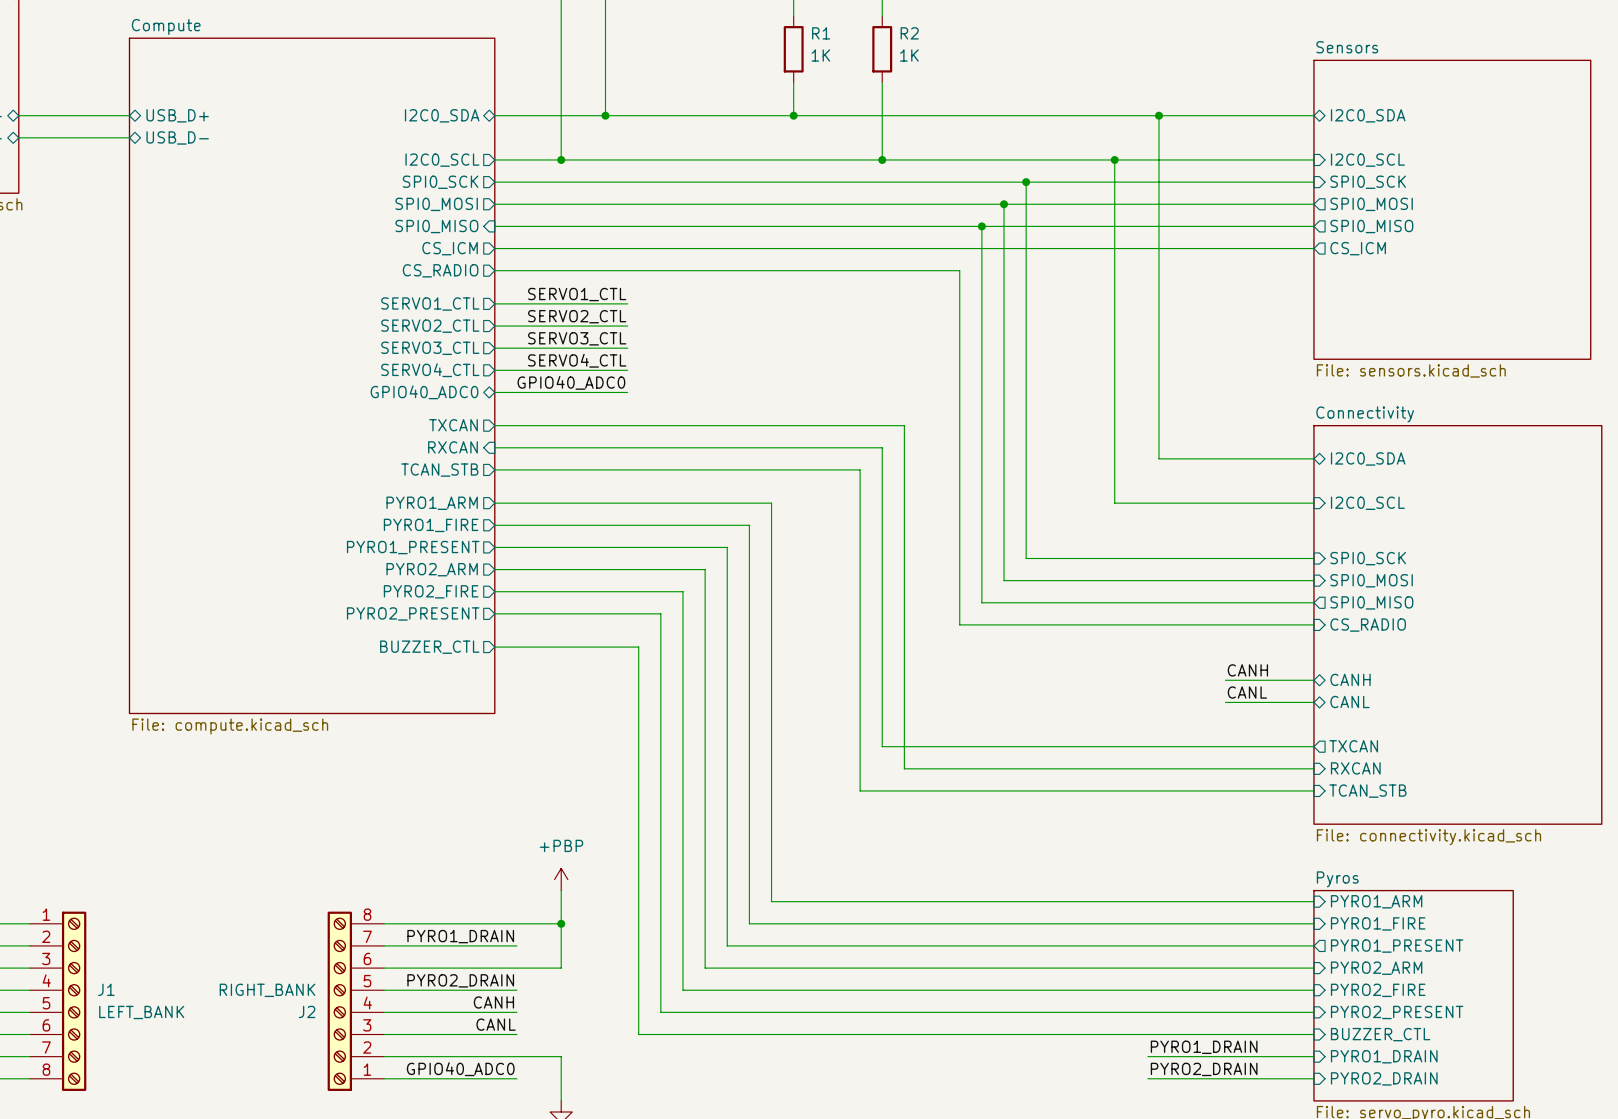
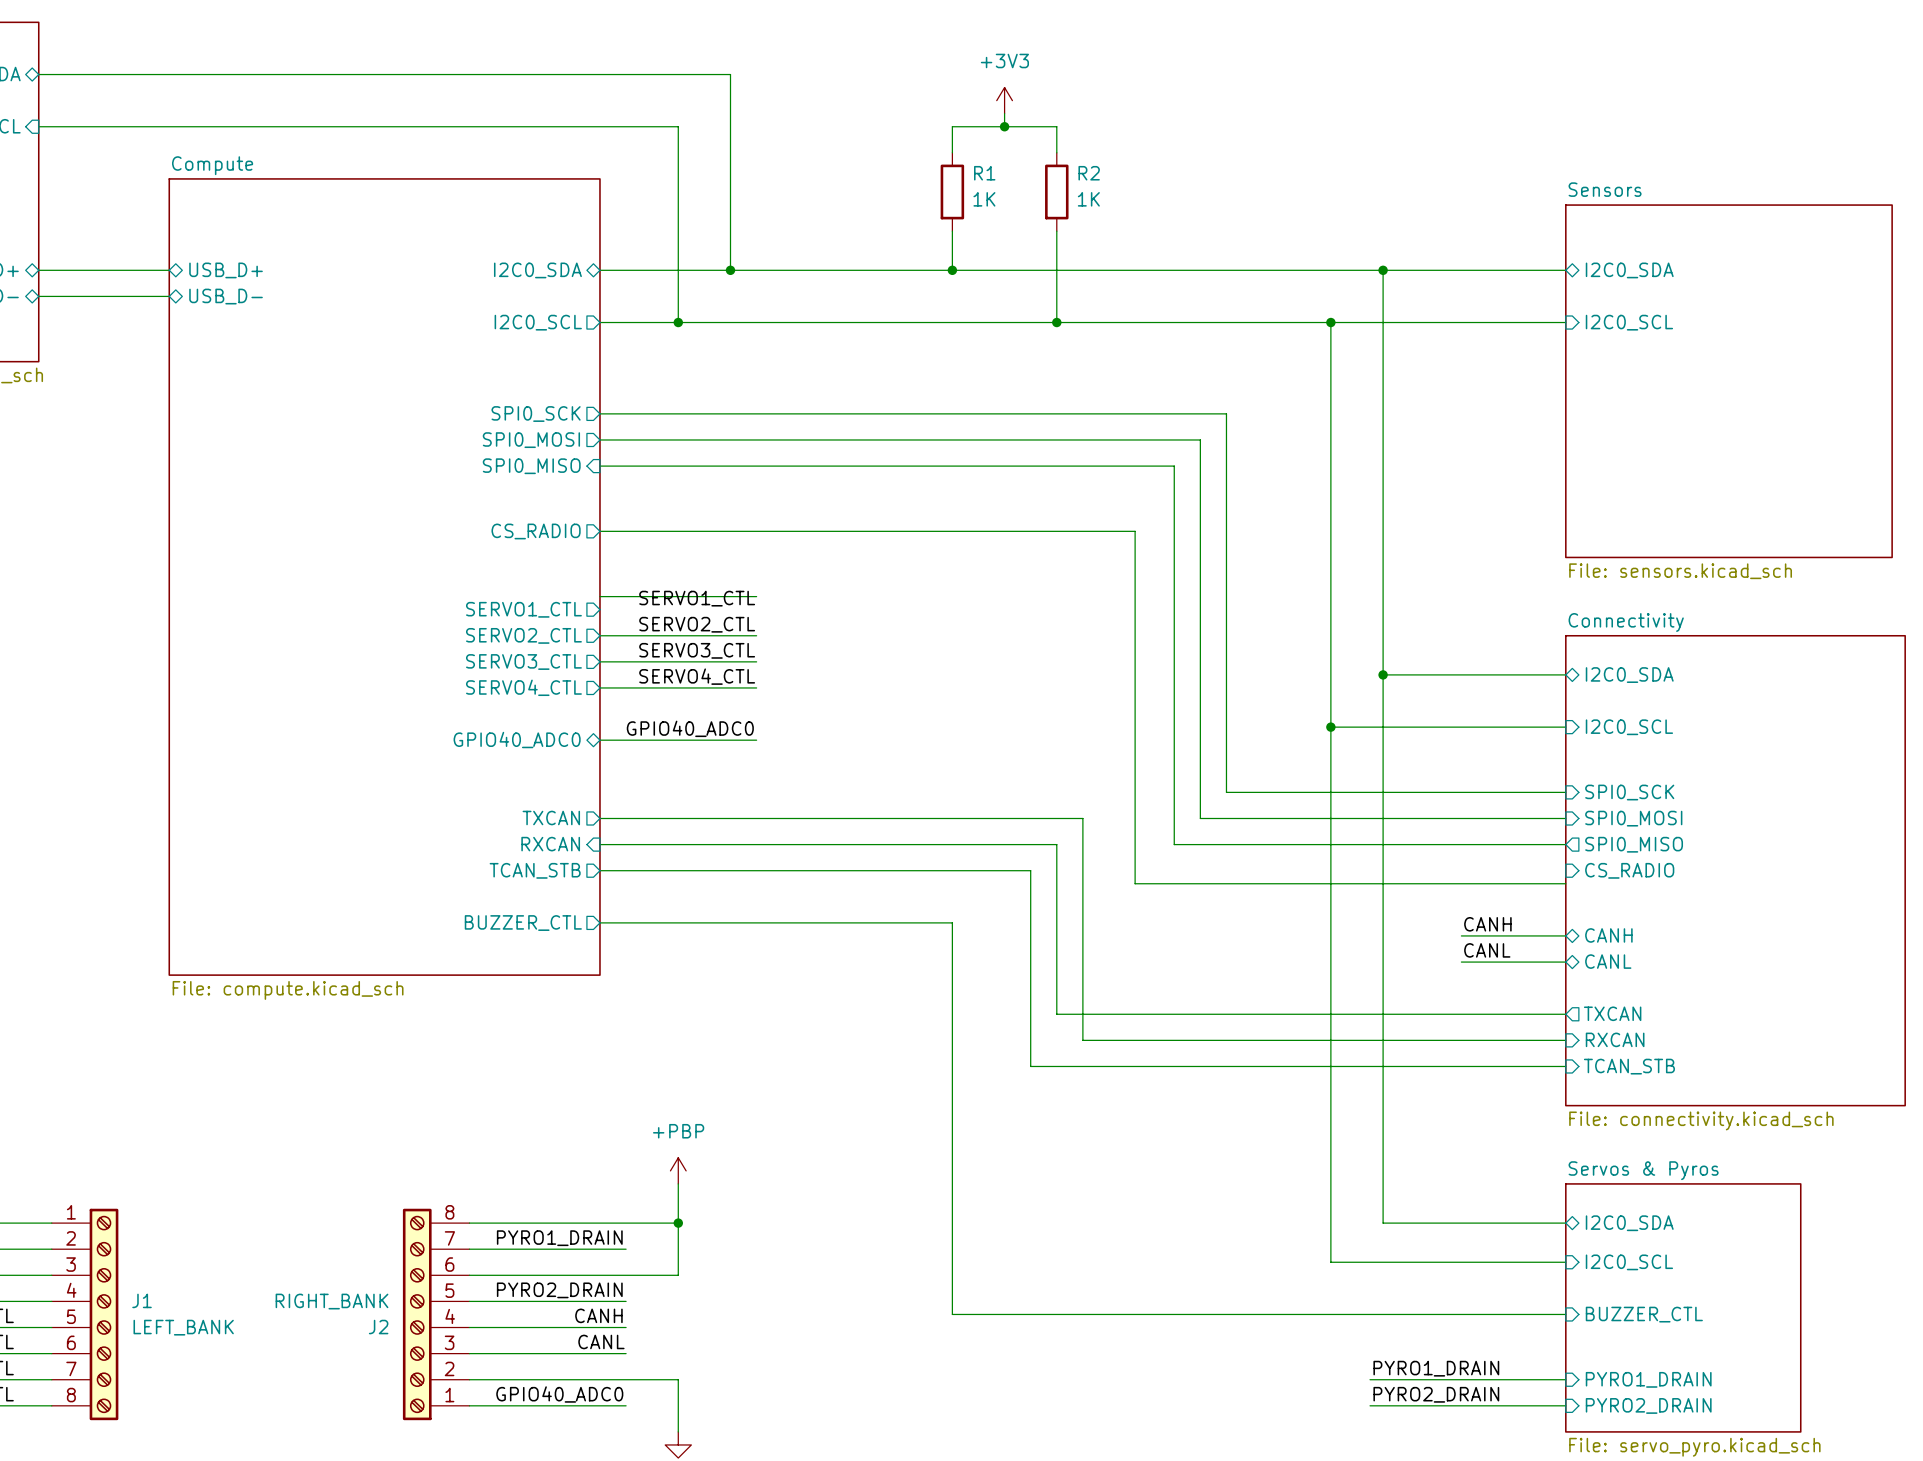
sheet pin position: SPI0_SCK (440, 182) -> SPI0_SCK (536, 414)
wire: (494, 182) (1313, 182) -> none
wire: (1026, 182) (1026, 237) -> (599, 413) (1226, 413)
junction: (1026, 182) -> none
sheet pin: SPI0_SCK (1368, 182) -> none
sheet pin position: SPI0_MOSI (436, 204) -> SPI0_MOSI (531, 440)
wire: (494, 204) (1313, 204) -> none
wire: (1004, 204) (1004, 259) -> (599, 439) (1200, 439)
junction: (1004, 204) -> none
sheet pin: SPI0_MOSI (1371, 204) -> none
sheet pin position: SPI0_MISO (436, 226) -> SPI0_MISO (531, 466)
wire: (494, 226) (1313, 226) -> none
wire: (981, 226) (981, 281) -> (599, 466) (1174, 466)
junction: (981, 226) -> none
sheet pin: SPI0_MISO (1371, 226) -> none
sheet pin: CS_ICM (450, 248) -> none
wire: (494, 248) (1313, 248) -> none
sheet pin: CS_ICM (1358, 248) -> none
sheet pin position: CS_RADIO (440, 270) -> CS_RADIO (536, 531)
wire: (494, 270) (959, 270) (959, 624) (1313, 624) -> none
label position: SERVO1_CTL (577, 294) -> SERVO1_CTL (697, 598)
wire: (494, 303) (627, 303) -> none
sheet pin position: SERVO1_CTL (430, 304) -> SERVO1_CTL (523, 609)
label position: SERVO2_CTL (577, 316) -> SERVO2_CTL (697, 624)
sheet pin: SERVO2_CTL (430, 326) -> none
wire: (494, 326) (627, 326) -> none
wire: none -> (599, 531) (1135, 531) (1135, 883) (1565, 883)
label position: SERVO3_CTL (577, 338) -> SERVO3_CTL (697, 650)
sheet pin: SERVO3_CTL (430, 348) -> none
wire: (494, 348) (627, 348) -> none
label position: SERVO4_CTL (577, 360) -> SERVO4_CTL (697, 676)
sheet pin: SERVO4_CTL (430, 370) -> none
wire: (494, 370) (627, 370) -> (599, 740) (756, 740)
label position: GPIO40_ADC0 (571, 382) -> GPIO40_ADC0 (690, 728)
sheet pin position: GPIO40_ADC0 (424, 392) -> GPIO40_ADC0 (517, 740)
sheet pin: TXCAN (453, 425) -> SERVO2_CTL (523, 635)
wire: (627, 425) (904, 425) (904, 580) -> (599, 818) (1082, 818)
sheet pin shape: input (452, 447) -> output (523, 662)
sheet pin: RXCAN (452, 447) -> SERVO3_CTL (523, 662)
wire: (627, 447) (882, 447) (882, 602) -> (599, 844) (1056, 844)
junction: none -> (1383, 674)
wire: (627, 469) (860, 469) (860, 624) -> (599, 870) (1030, 870)
sheet pin: TCAN_STB (439, 470) -> SERVO4_CTL (523, 687)
sheet pin: PYRO1_ARM (432, 503) -> none
wire: (494, 503) (771, 503) (771, 901) (1313, 901) -> none
wire: none -> (1330, 727) (1330, 1262) (1565, 1262)
junction: none -> (1330, 727)
sheet pin: PYRO1_FIRE (431, 525) -> none
wire: (494, 525) (749, 525) (749, 923) (1158, 923) -> (1383, 674) (1383, 1223)
sheet pin: PYRO1_PRESENT (413, 547) -> none
wire: (494, 547) (727, 547) (727, 945) (1313, 945) -> none
sheet pin: PYRO2_ARM (432, 569) -> none
wire: (494, 569) (705, 569) (705, 968) (1313, 968) -> none
sheet pin: none -> TXCAN (551, 818)
sheet pin: PYRO2_FIRE (431, 591) -> none
wire: (494, 591) (682, 591) (682, 990) (1313, 990) -> none
sheet pin: none -> RXCAN (550, 844)
sheet pin: PYRO2_PRESENT (413, 613) -> none
wire: (494, 613) (660, 613) (660, 1012) (1313, 1012) -> none
sheet pin: none -> TCAN_STB (535, 870)
sheet pin position: BUZZER_CTL (429, 647) -> BUZZER_CTL (523, 923)
wire: (494, 647) (638, 647) (638, 1034) (1313, 1034) -> none
wire: none -> (599, 922) (952, 922) (952, 1314) (1565, 1314)
sheet Pyros name: Pyros (1337, 879) -> Servos & Pyros (1643, 1170)
sheet pin: PYRO1_ARM (1376, 901) -> none
sheet pin shape: input (1378, 923) -> bidirectional (1629, 1223)
sheet pin: PYRO1_FIRE (1378, 923) -> I2C0_SDA (1629, 1223)
sheet pin: PYRO1_PRESENT (1397, 946) -> none
sheet pin: none -> I2C0_SCL (1629, 1262)
sheet pin: PYRO2_ARM (1376, 968) -> none
sheet pin: PYRO2_FIRE (1378, 990) -> none
sheet pin: PYRO2_PRESENT (1397, 1012) -> none
sheet pin position: BUZZER_CTL (1380, 1034) -> BUZZER_CTL (1644, 1314)

